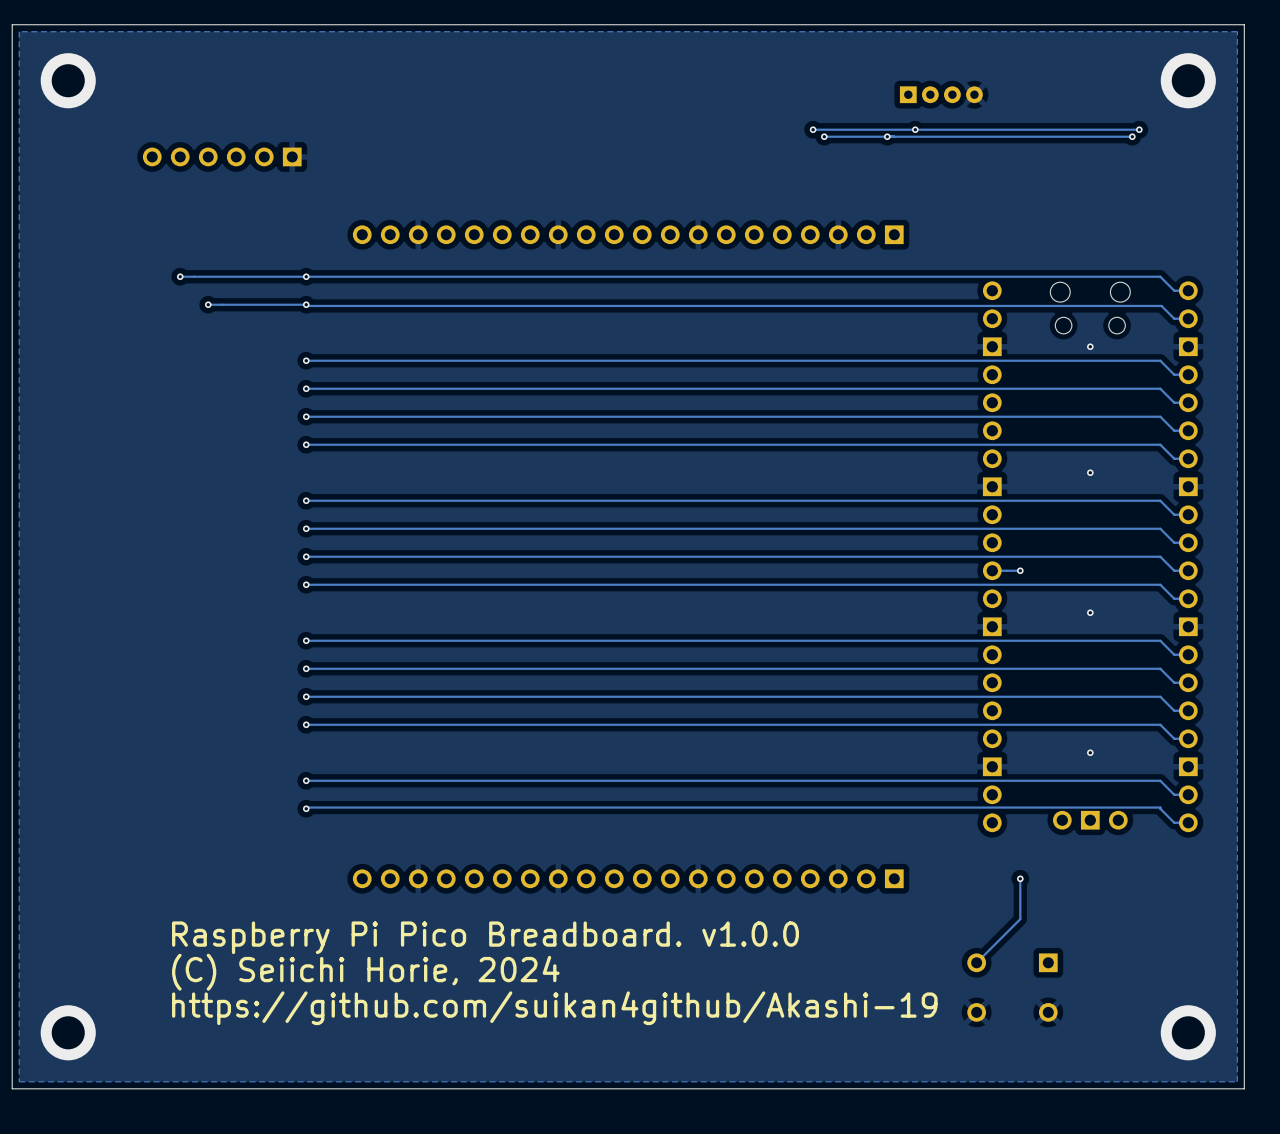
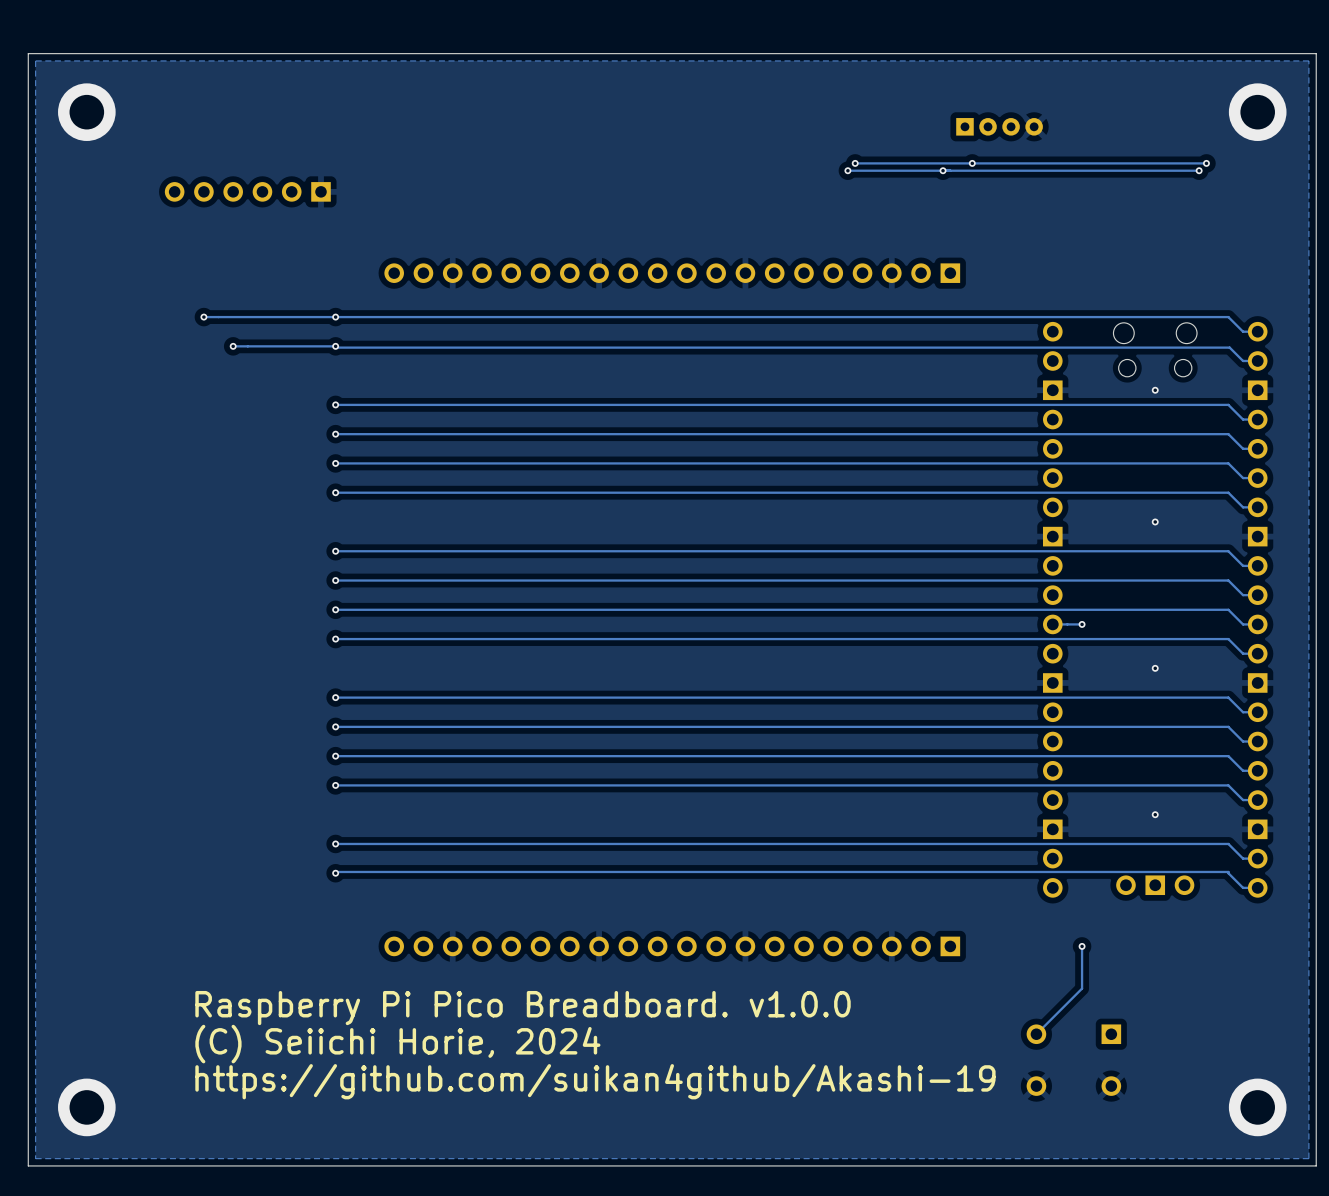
via: none -> (855, 163)
track: none -> (865, 163) (855, 163)
via: (813, 129) -> none
via: none -> (847, 170)
track: none -> (877, 170) (847, 170)
via: (824, 136) -> none

